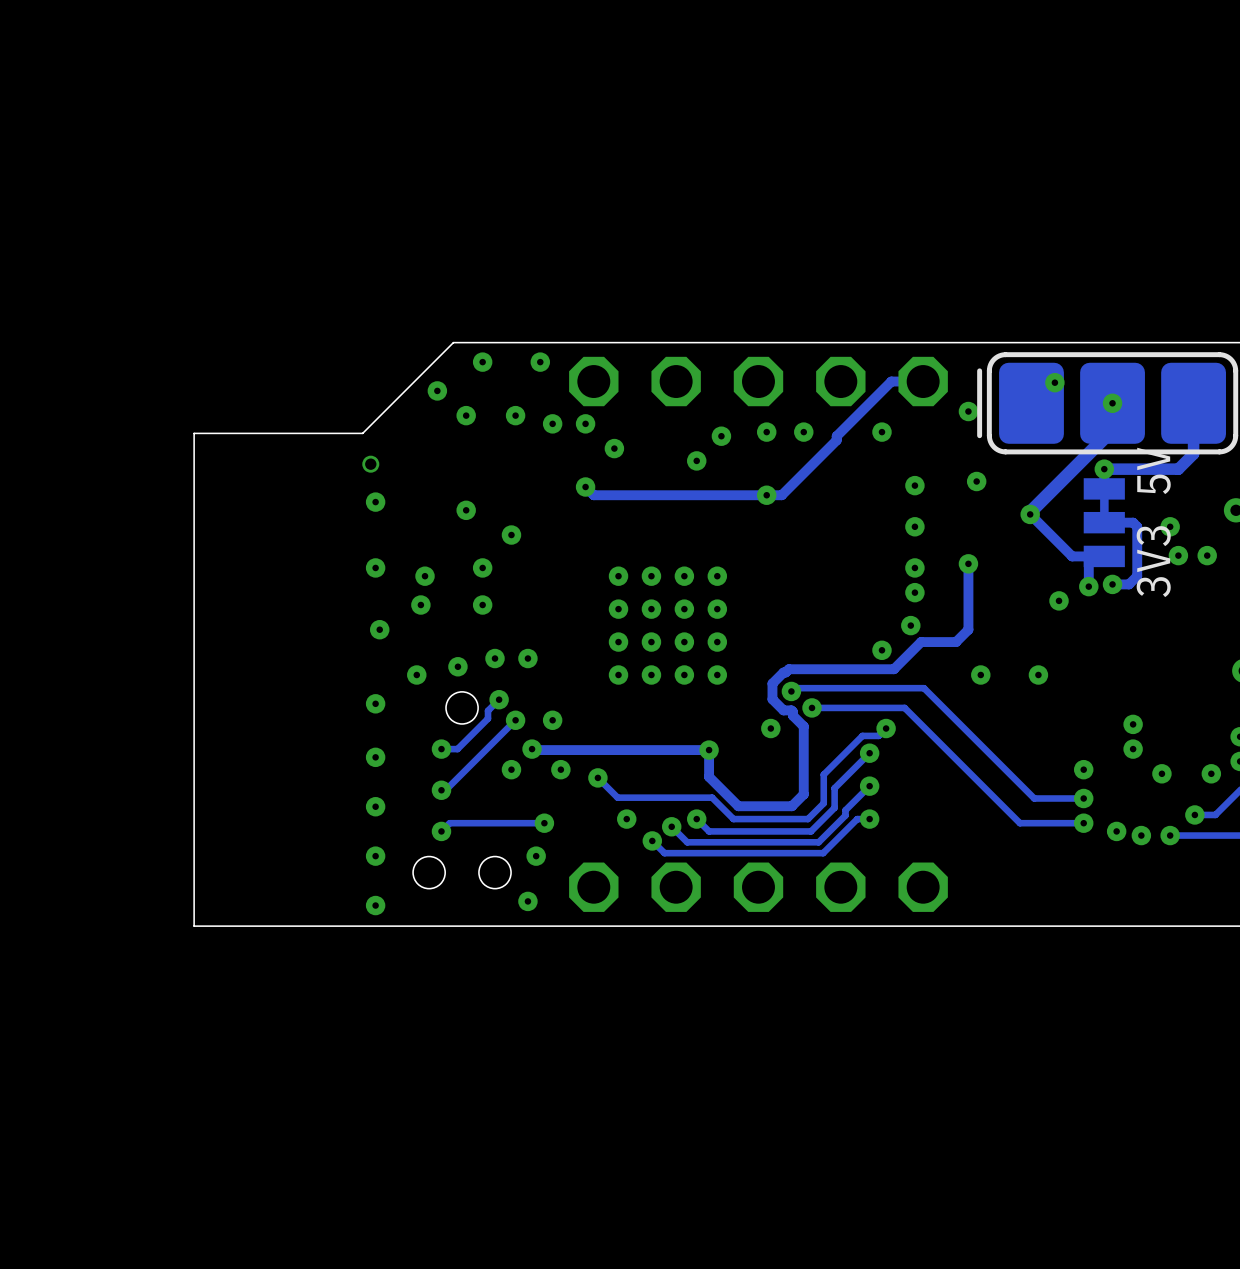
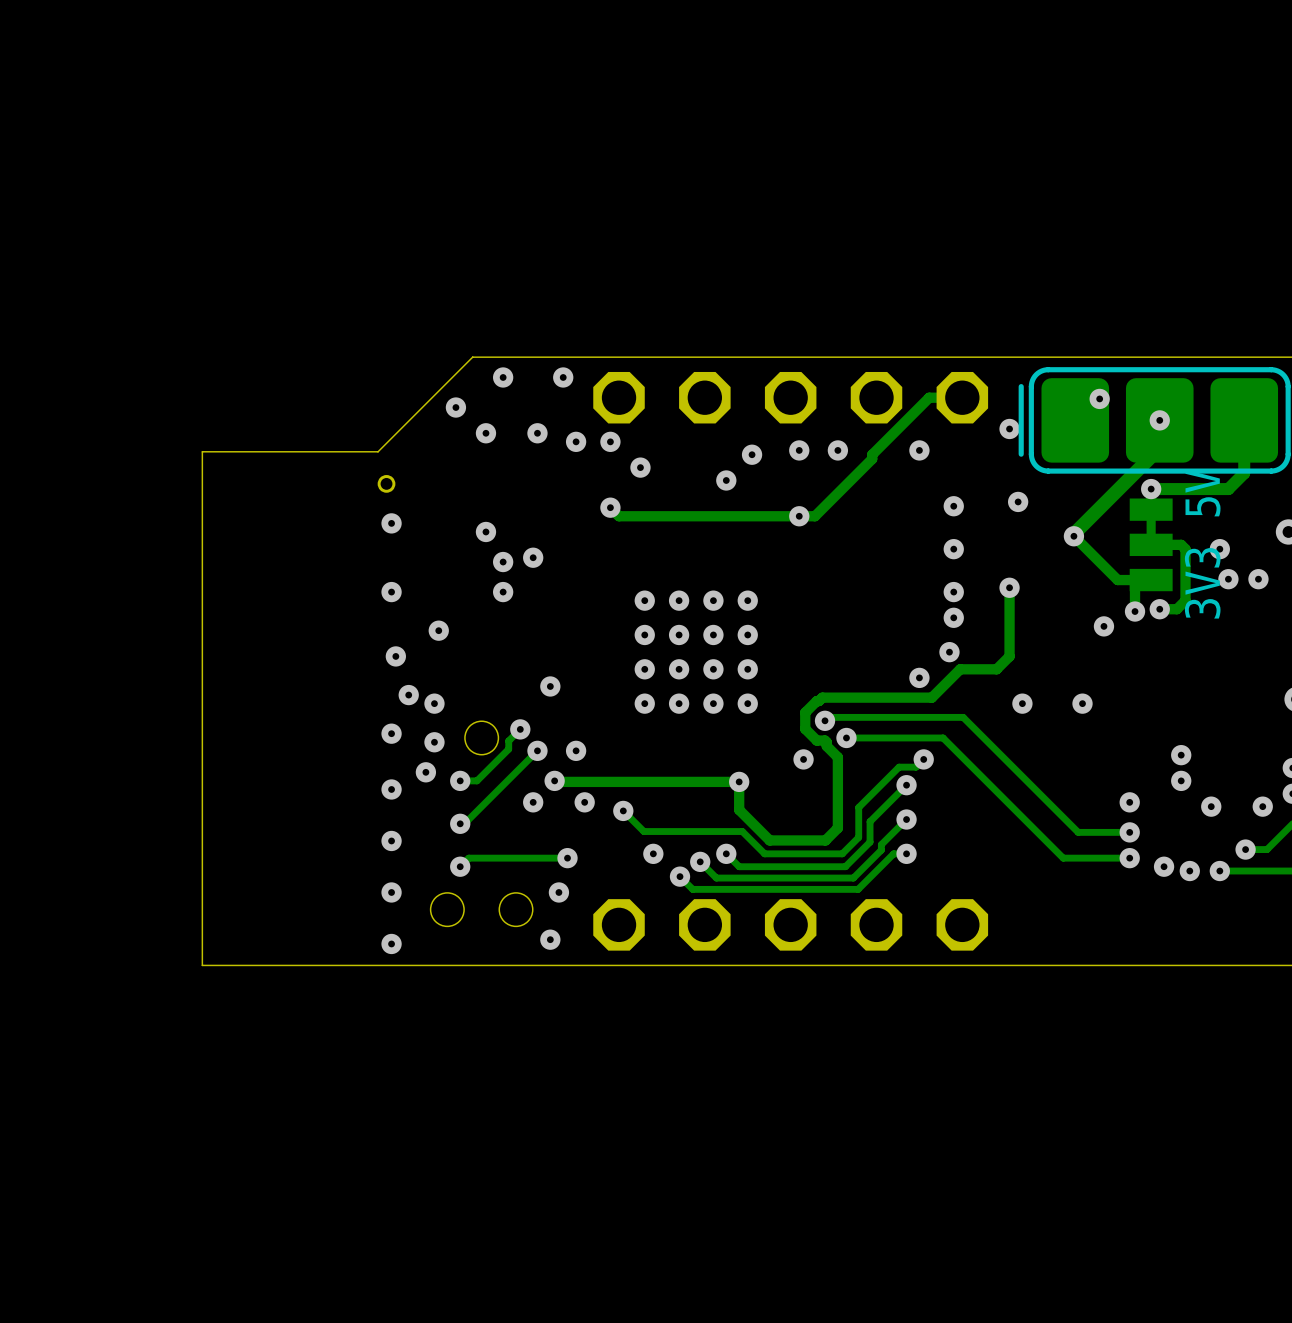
via: none -> (503, 562)
via: (425, 576) -> none
via: (482, 605) -> none
via: (495, 658) -> none
via: none -> (408, 695)
via: (457, 666) -> none
via: none -> (434, 742)
via: none -> (425, 772)

